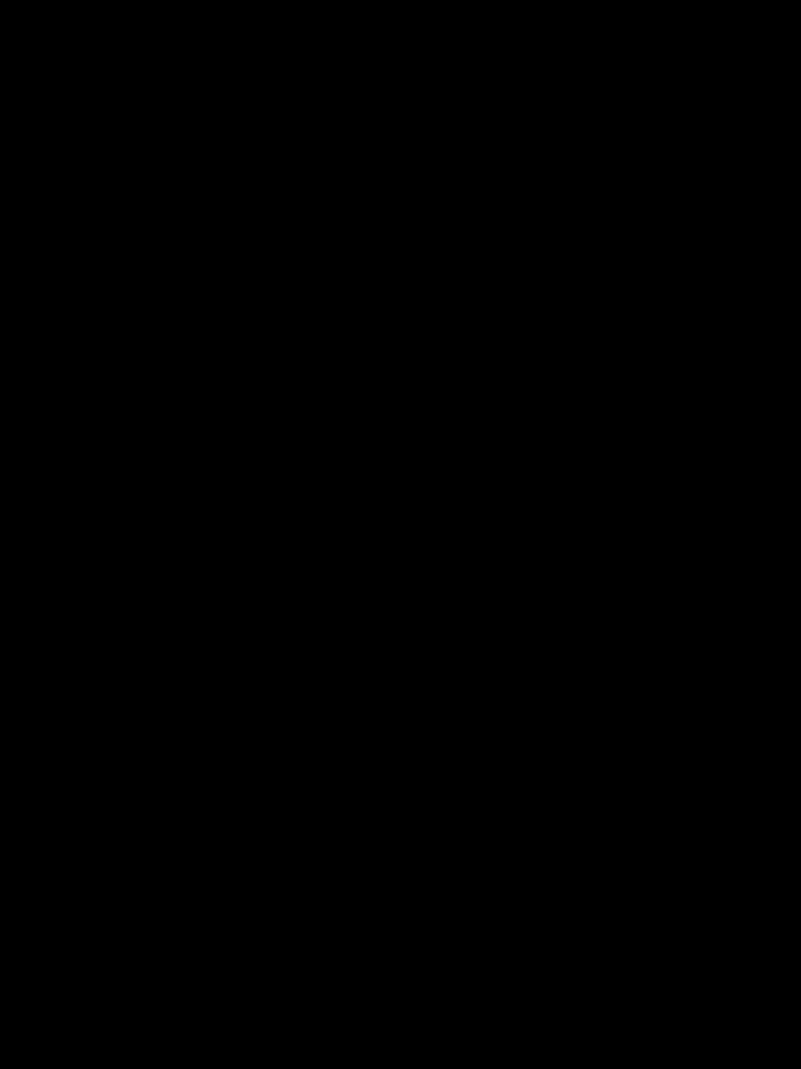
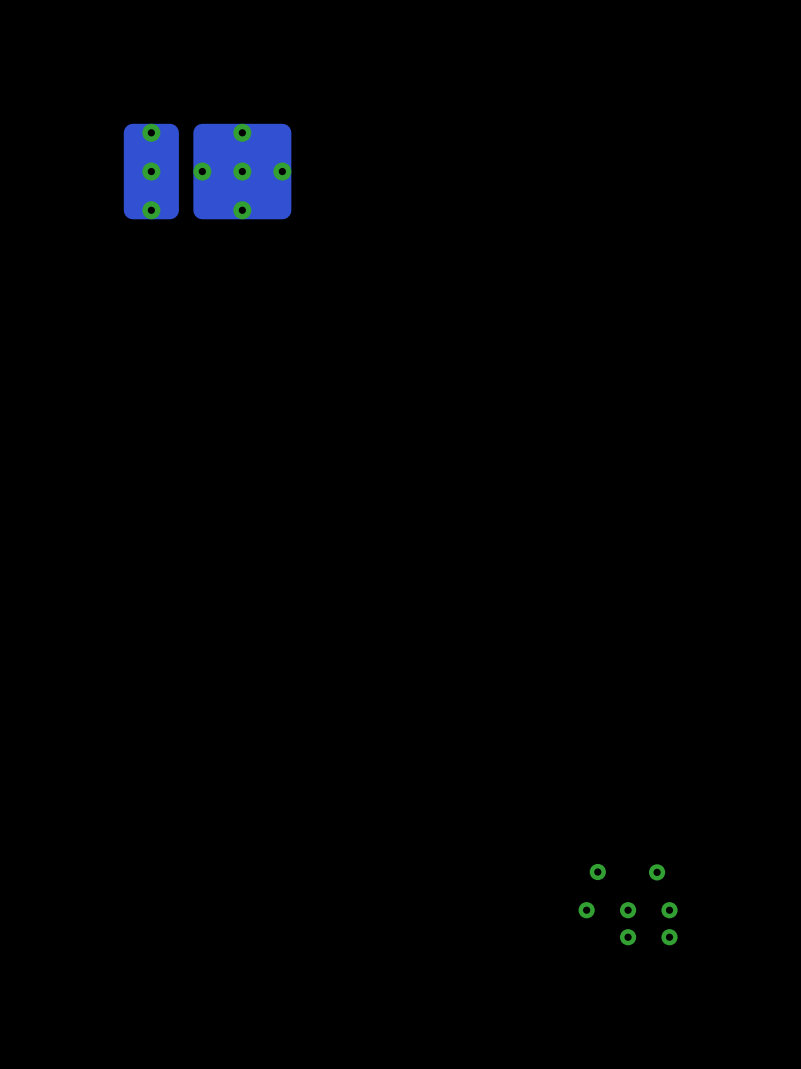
part: none -> (207, 171)
part: none -> (628, 904)

